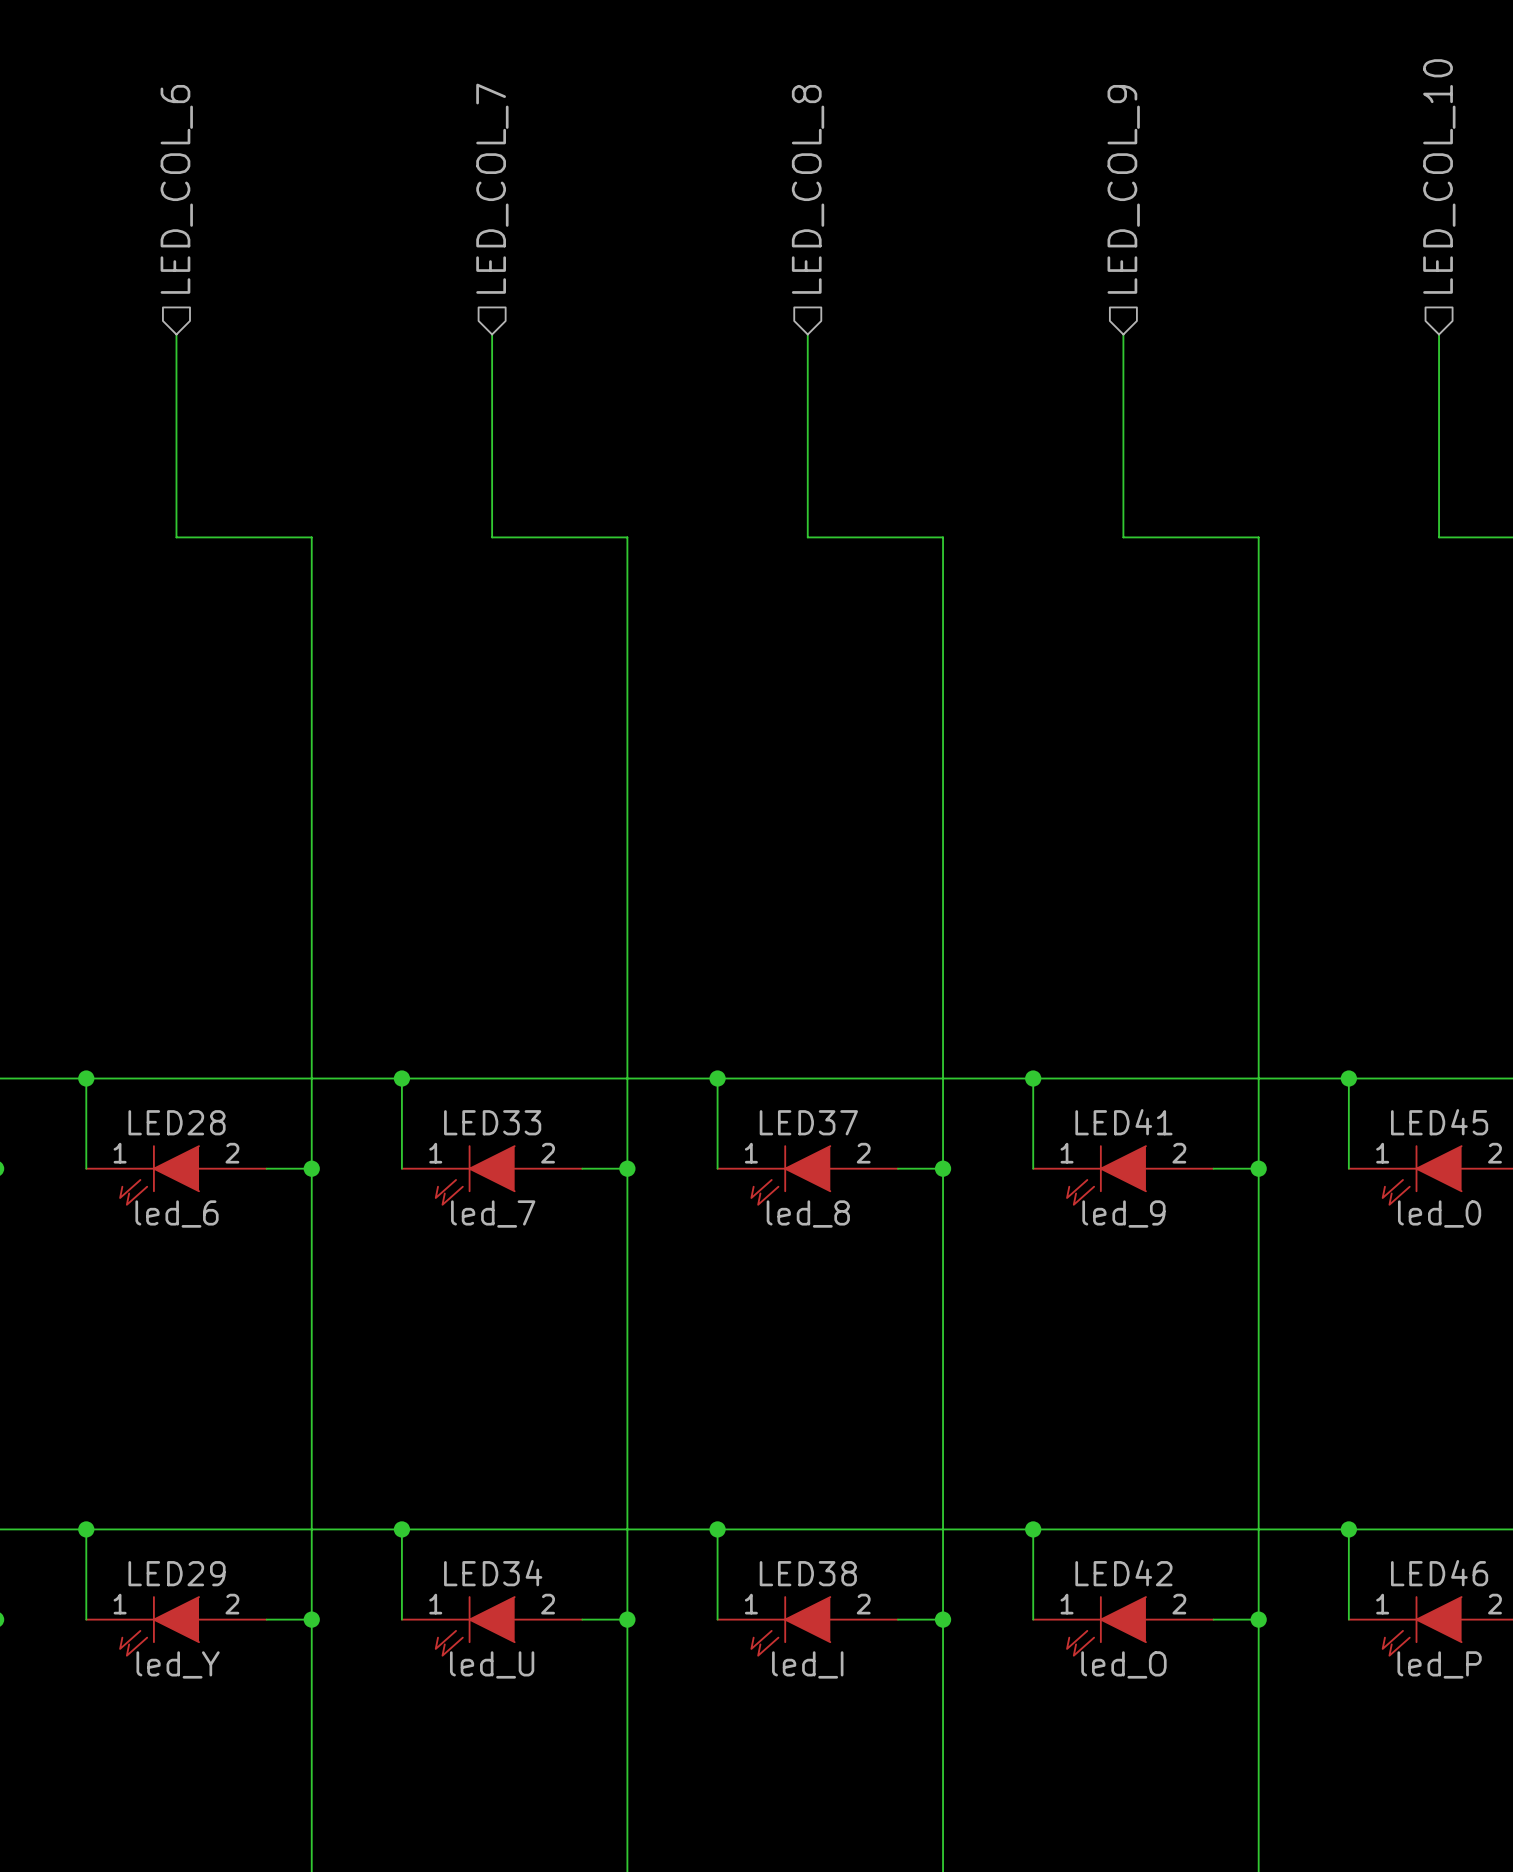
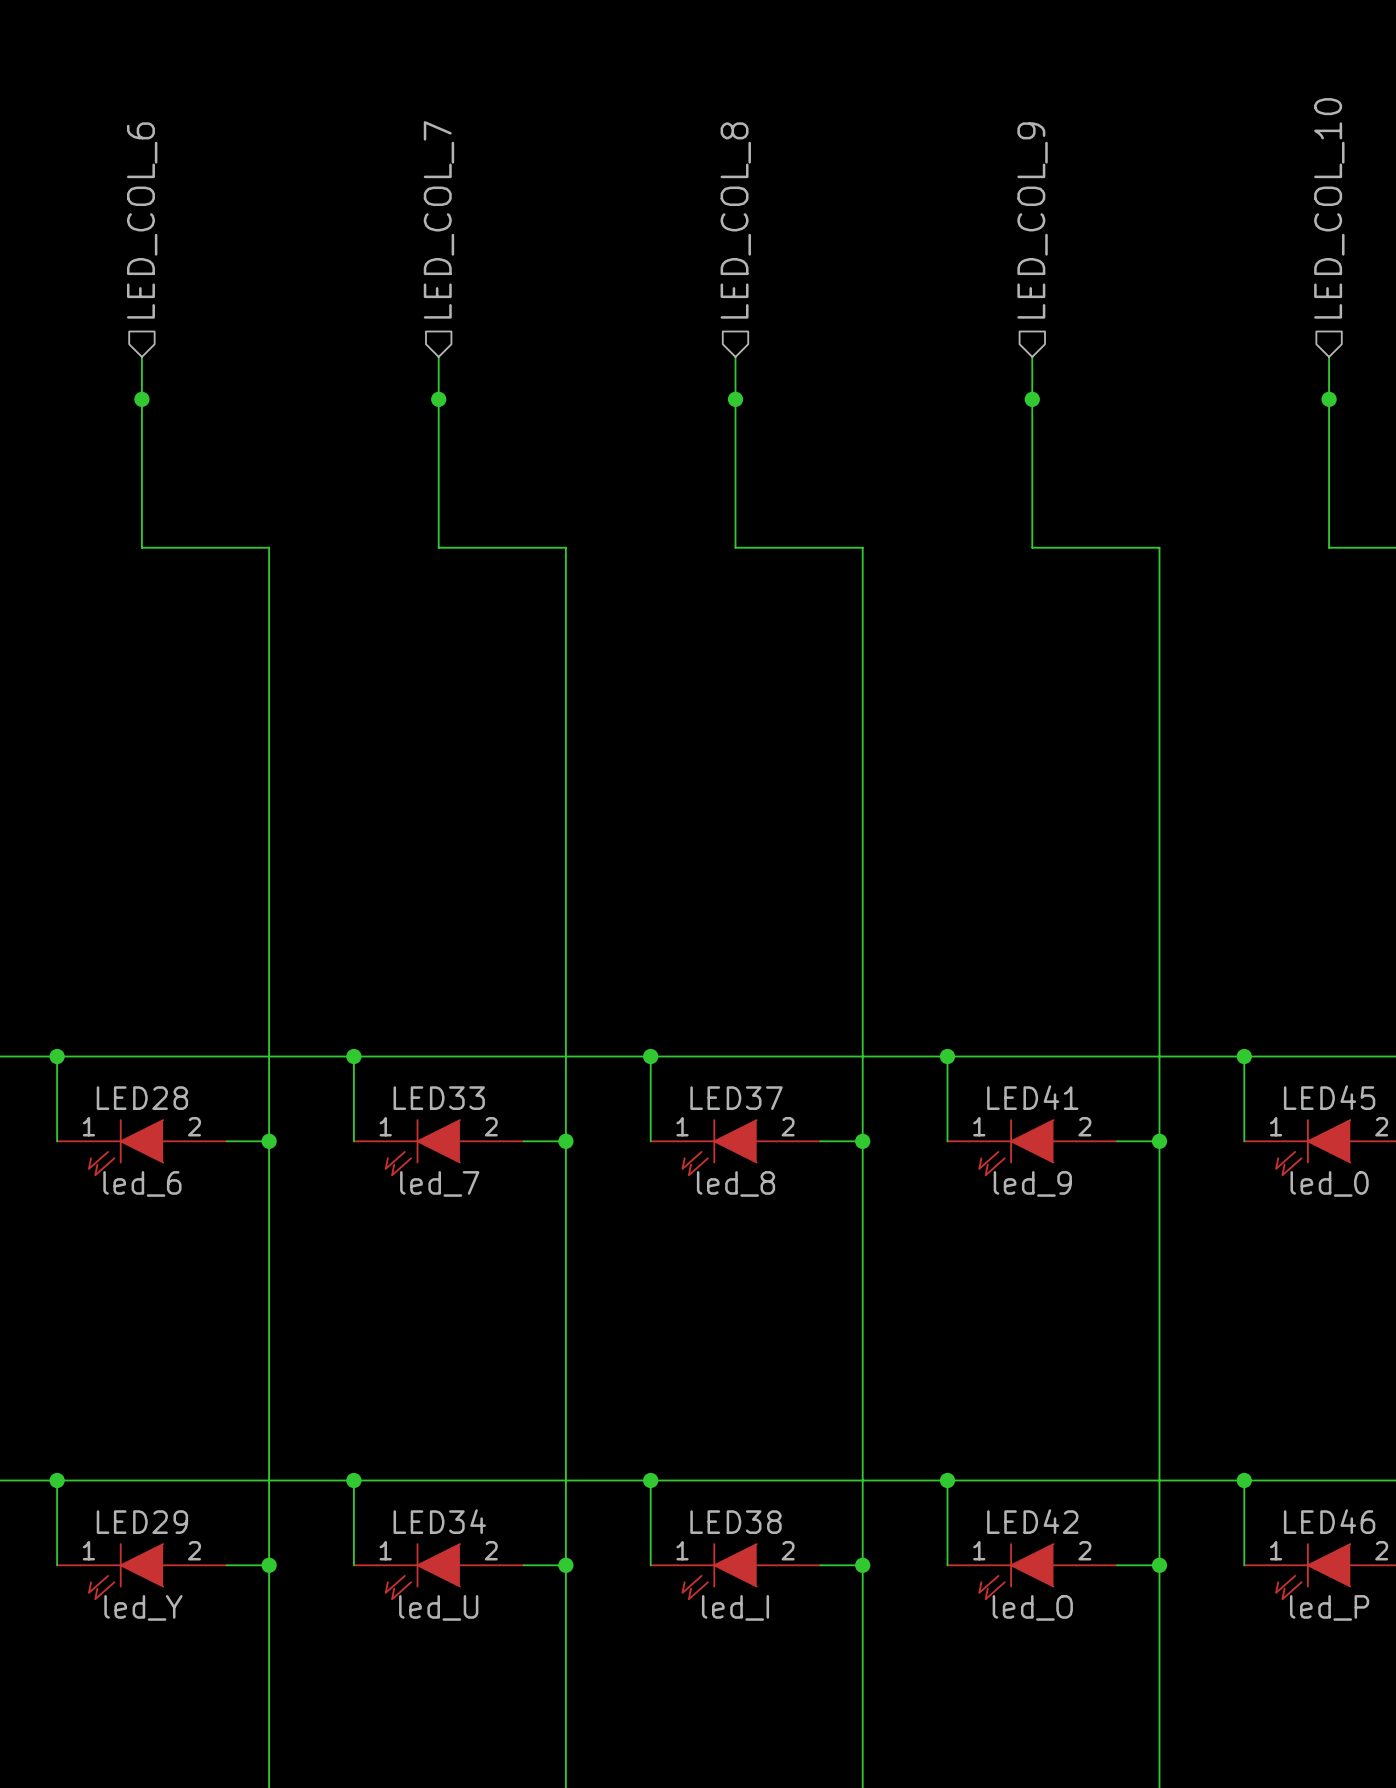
junction: none -> (141, 399)
junction: none -> (438, 399)
junction: none -> (735, 399)
junction: none -> (1032, 399)
junction: none -> (1329, 399)

